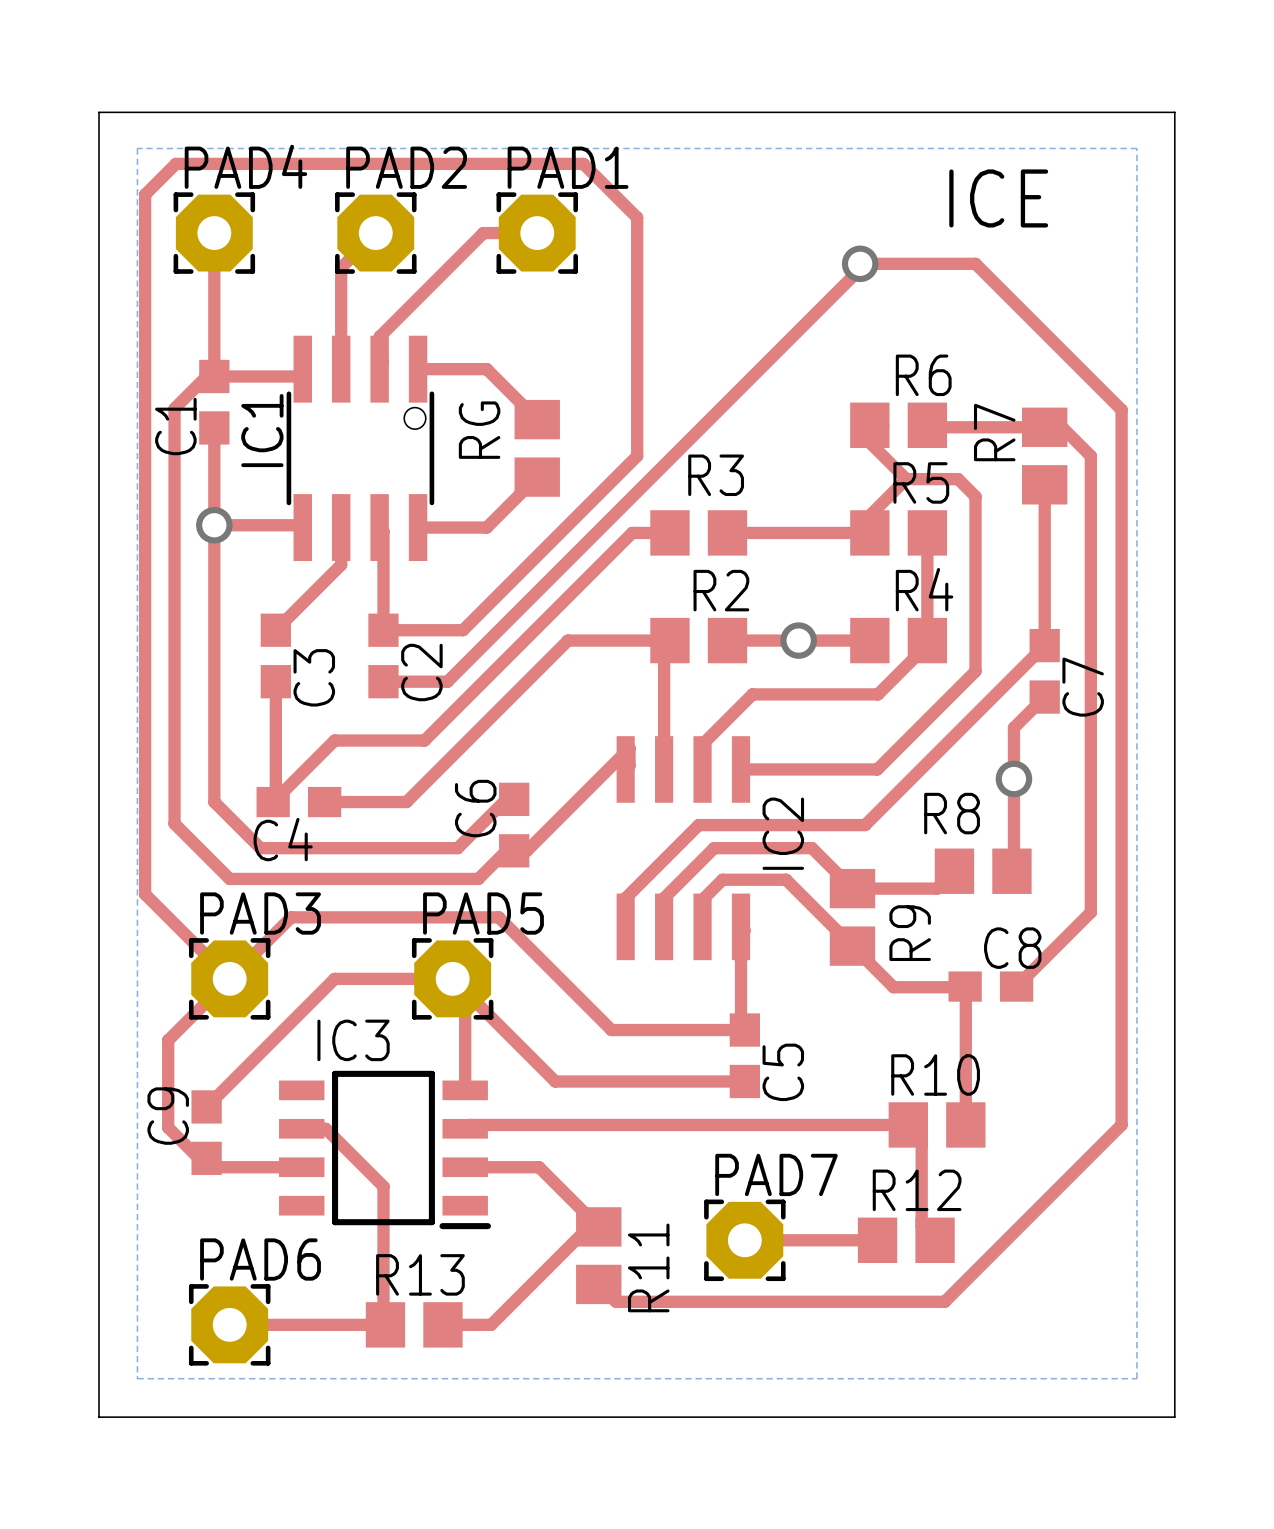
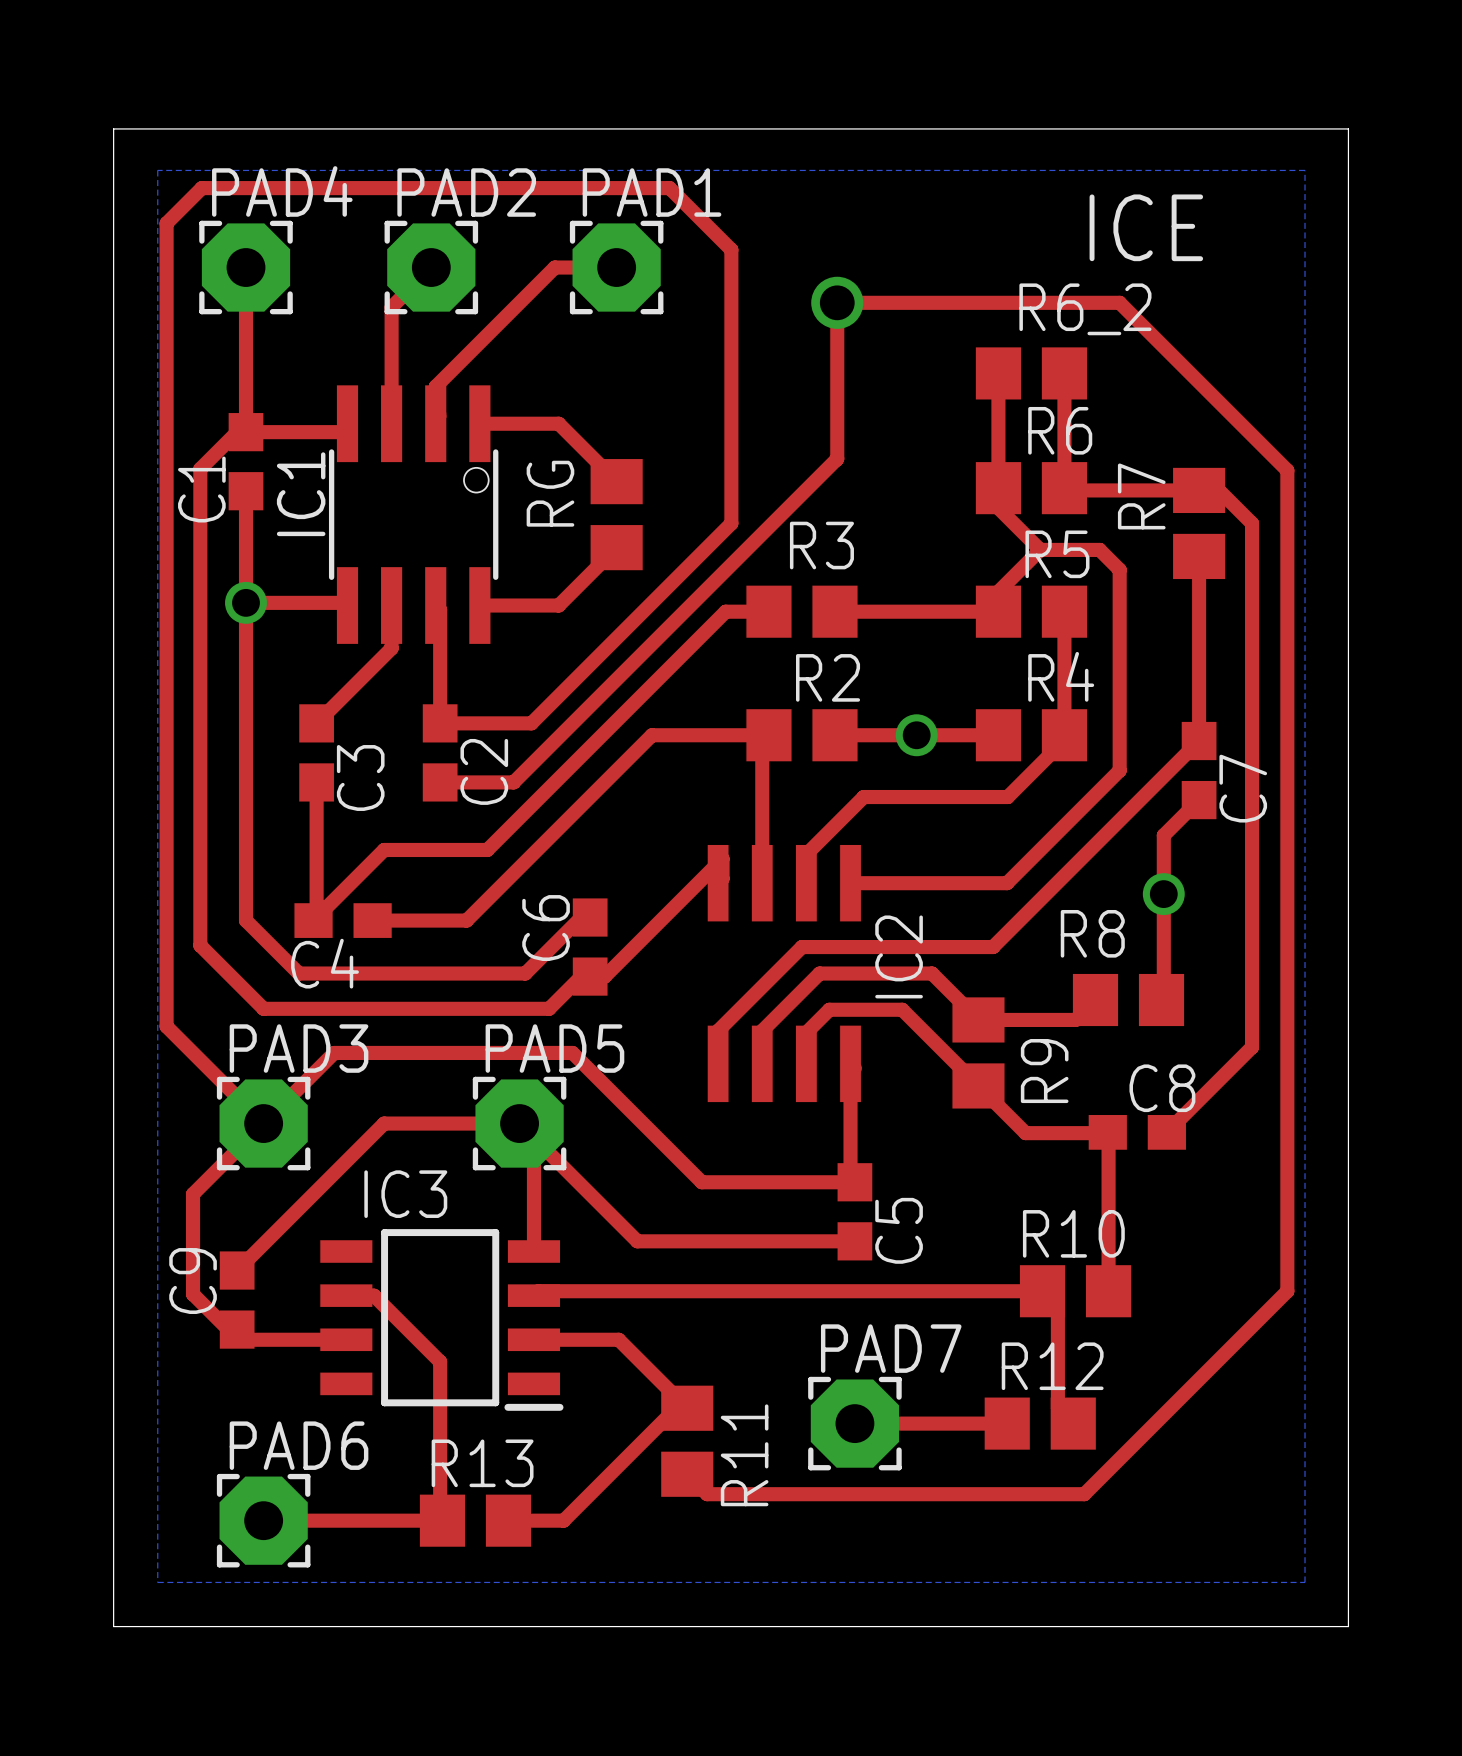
via: none -> (837, 302)
via: (860, 263) -> none
top track: (865, 263) (729, 399) -> (987, 302) (837, 302) (837, 458)
top track: none -> (998, 373) (998, 488)
R6_2: none -> (1031, 373)
top track: none -> (1064, 373) (1064, 488)

